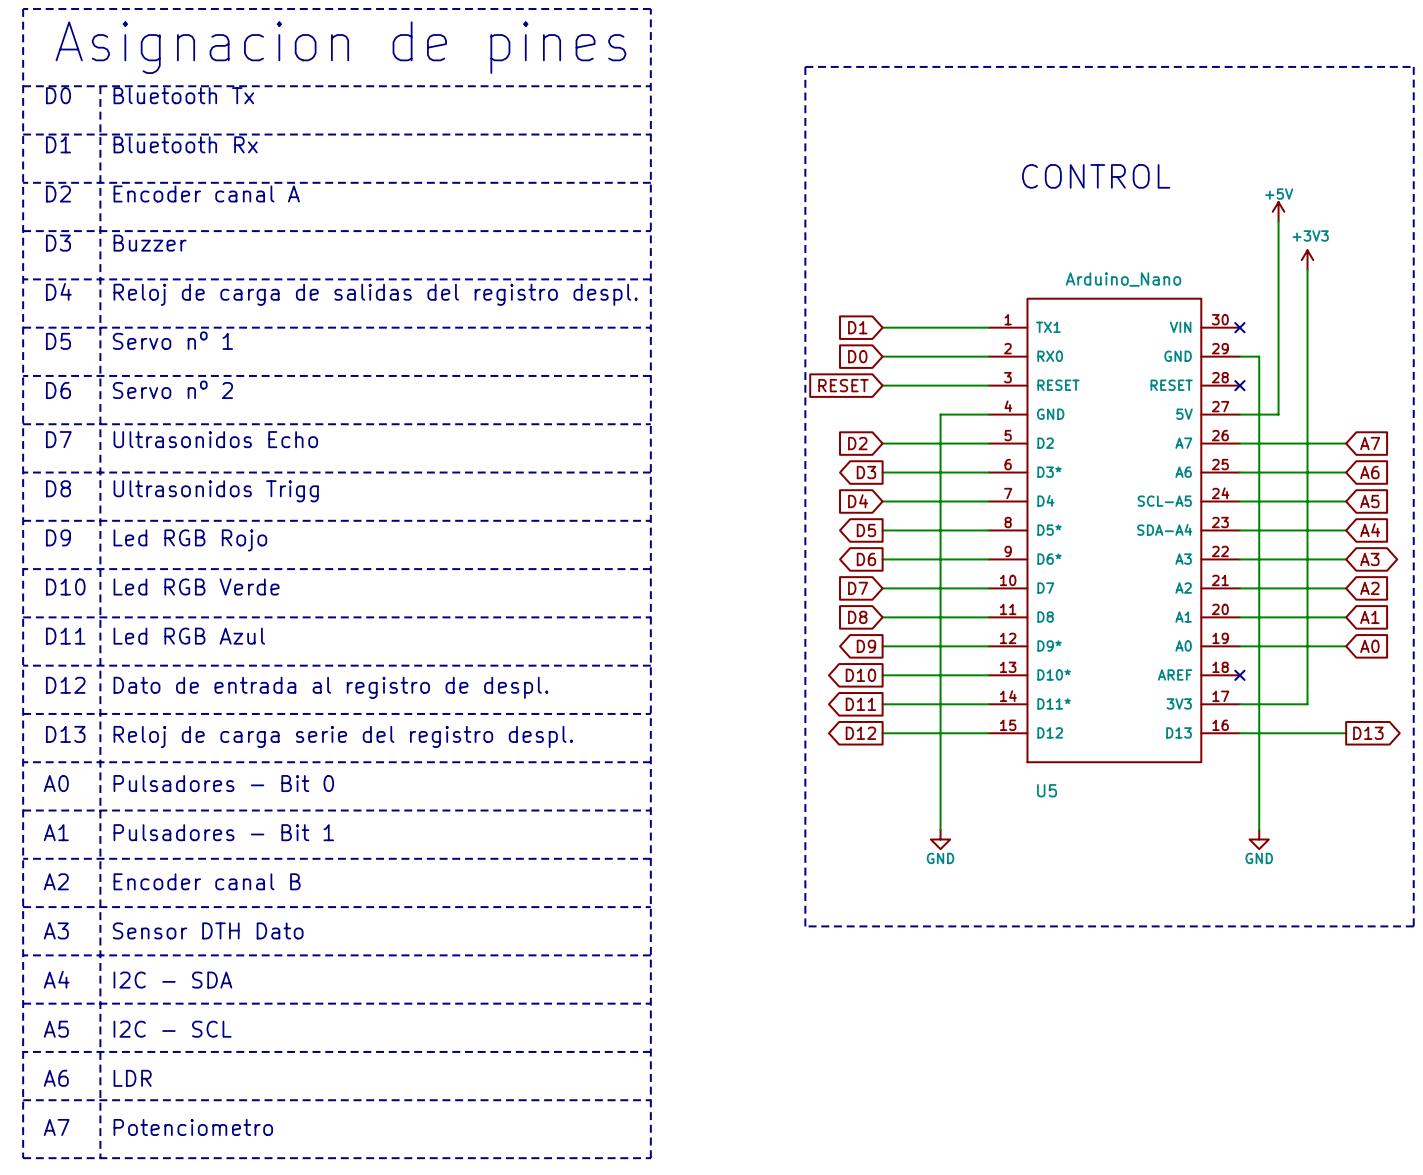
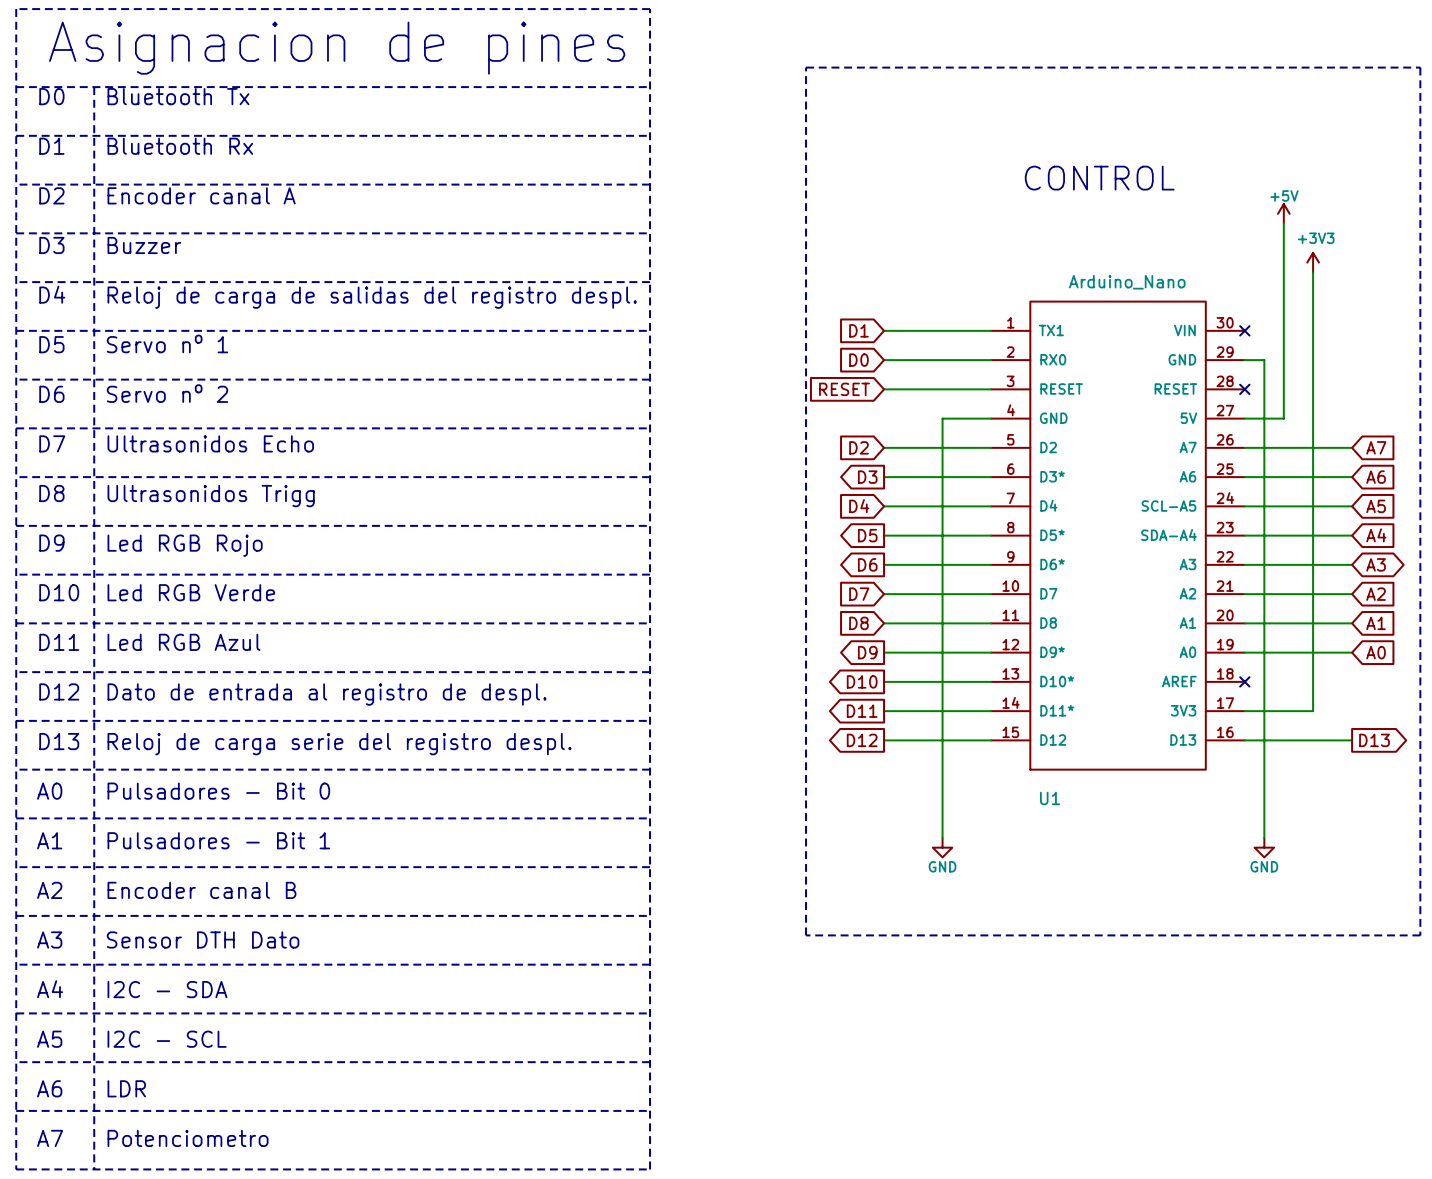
U5 name: U5 (1047, 790) -> U1 (1050, 798)

